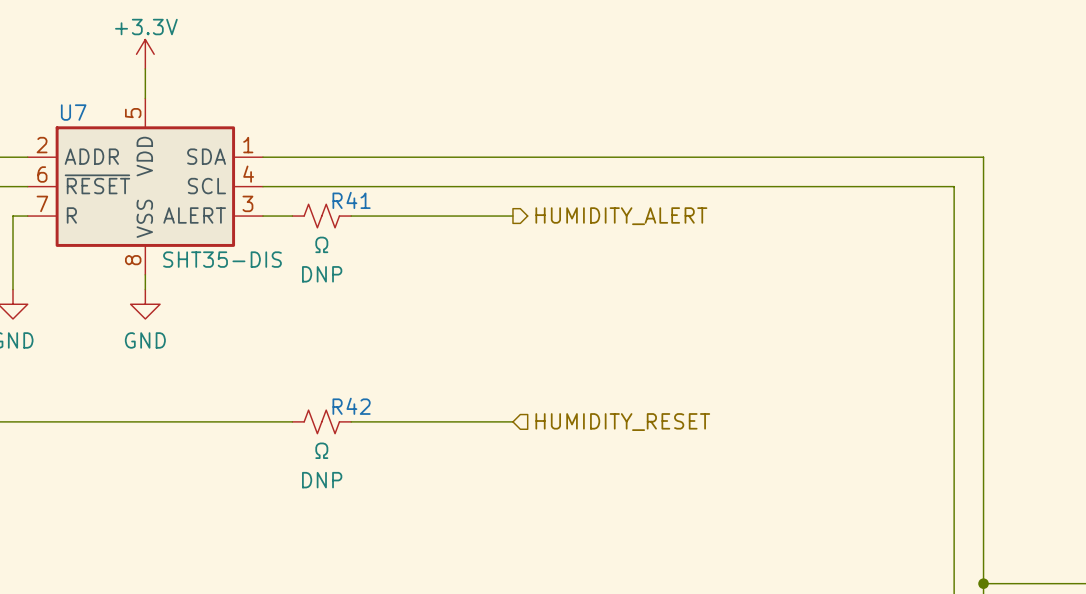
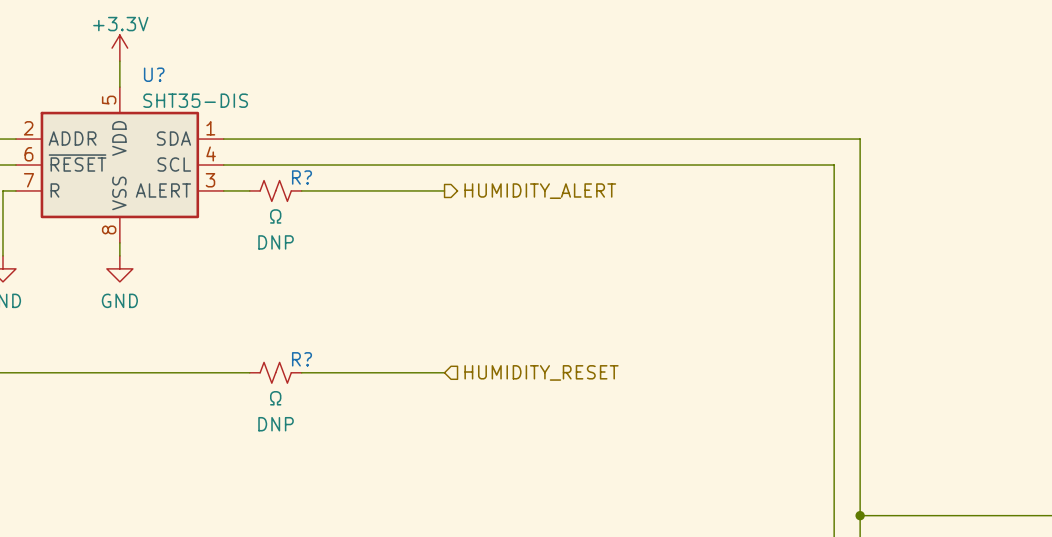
U7 name: U7 (73, 112) -> U? (154, 74)
R41 name: R41 (351, 200) -> R? (302, 177)
U7 value position: SHT35-DIS (222, 259) -> SHT35-DIS (195, 100)
R42 name: R42 (351, 406) -> R? (302, 359)

